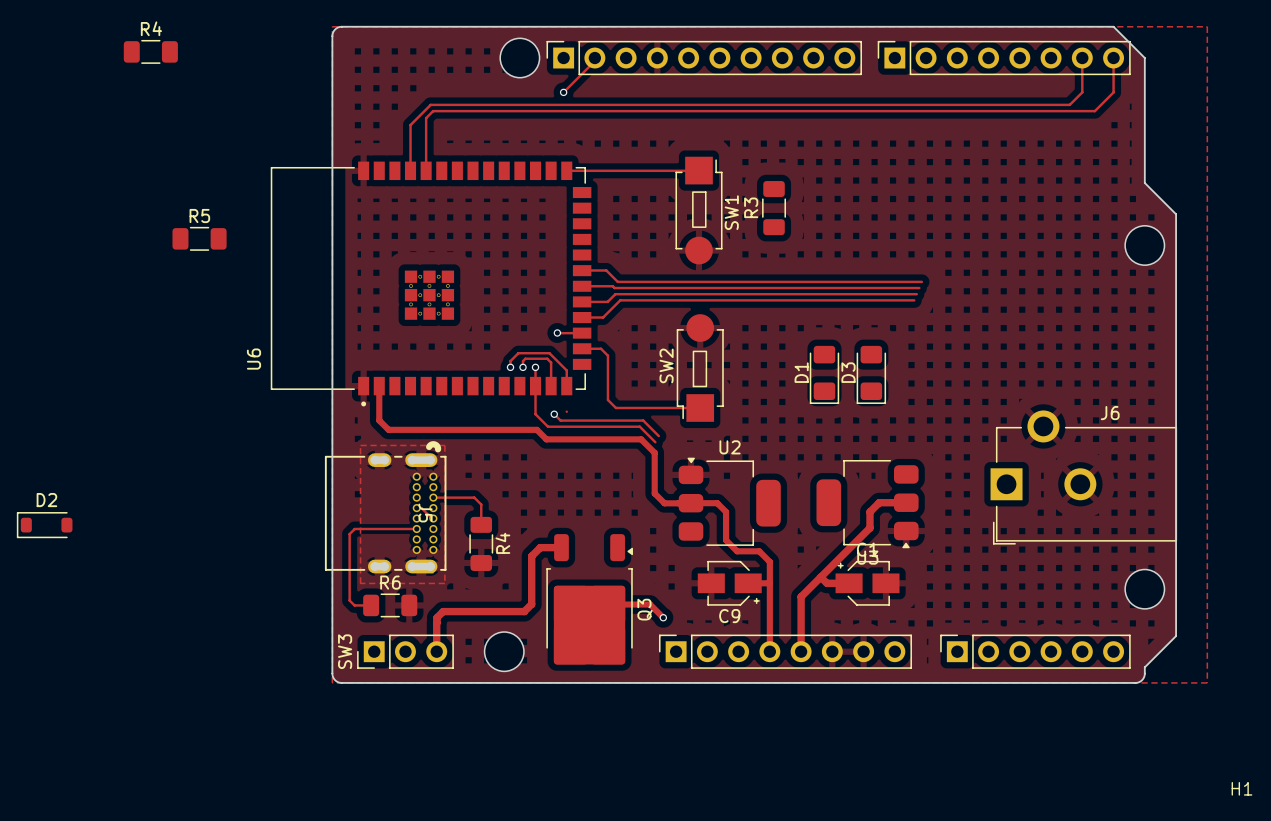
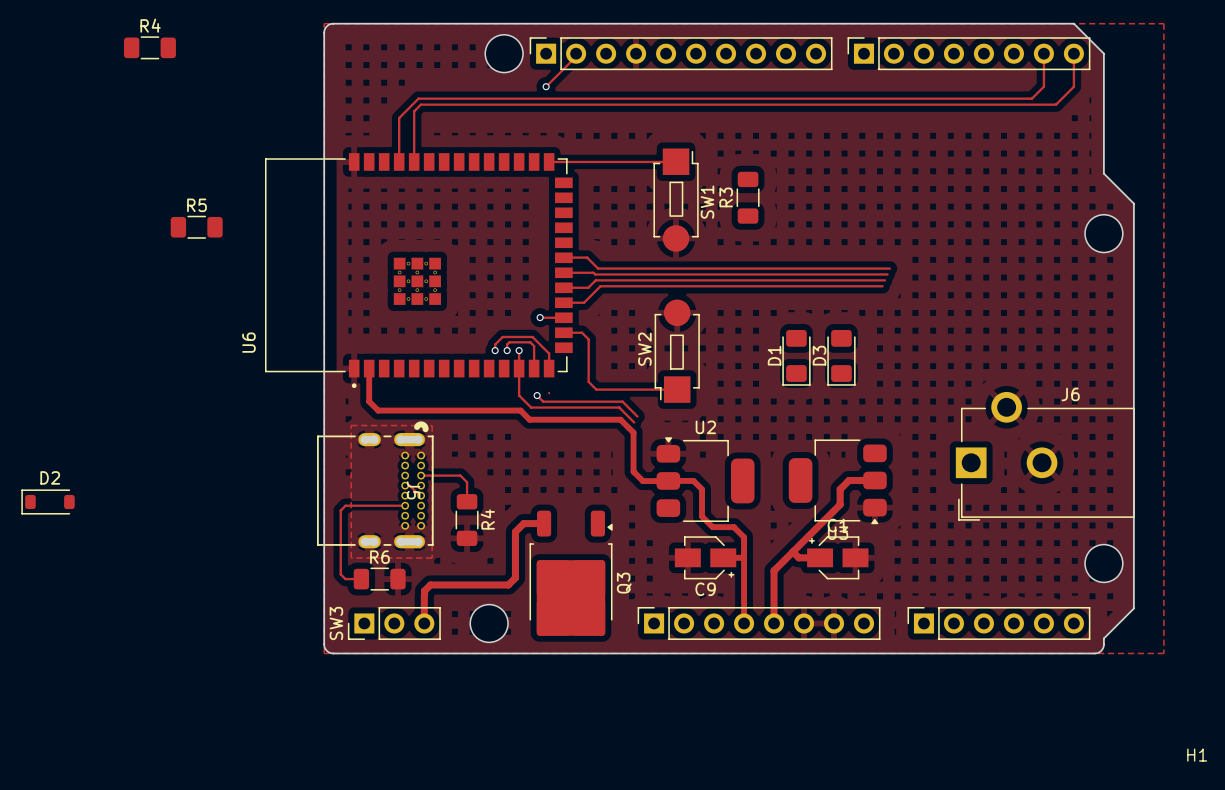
track: (608, 604) (650, 604) (663, 617) -> none
via: (663, 617) -> none

